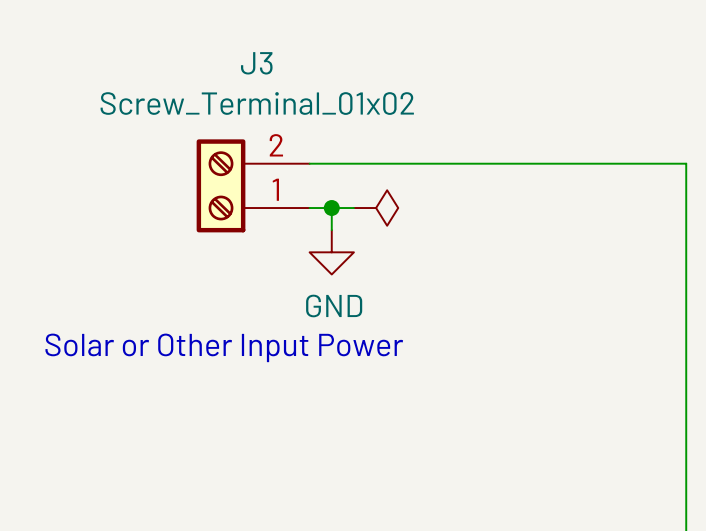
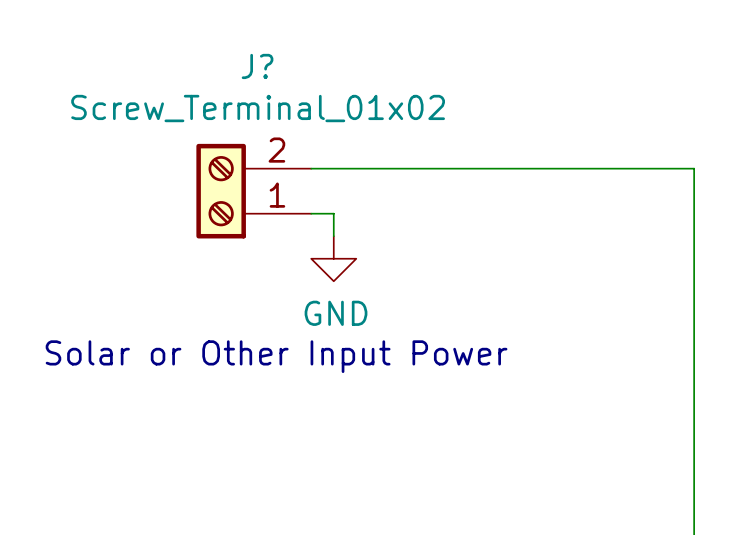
J3 name: J3 (256, 63) -> J? (257, 66)
wire: (331, 208) (353, 208) -> none
junction: (331, 208) -> none
power symbol: (376, 208) -> none

